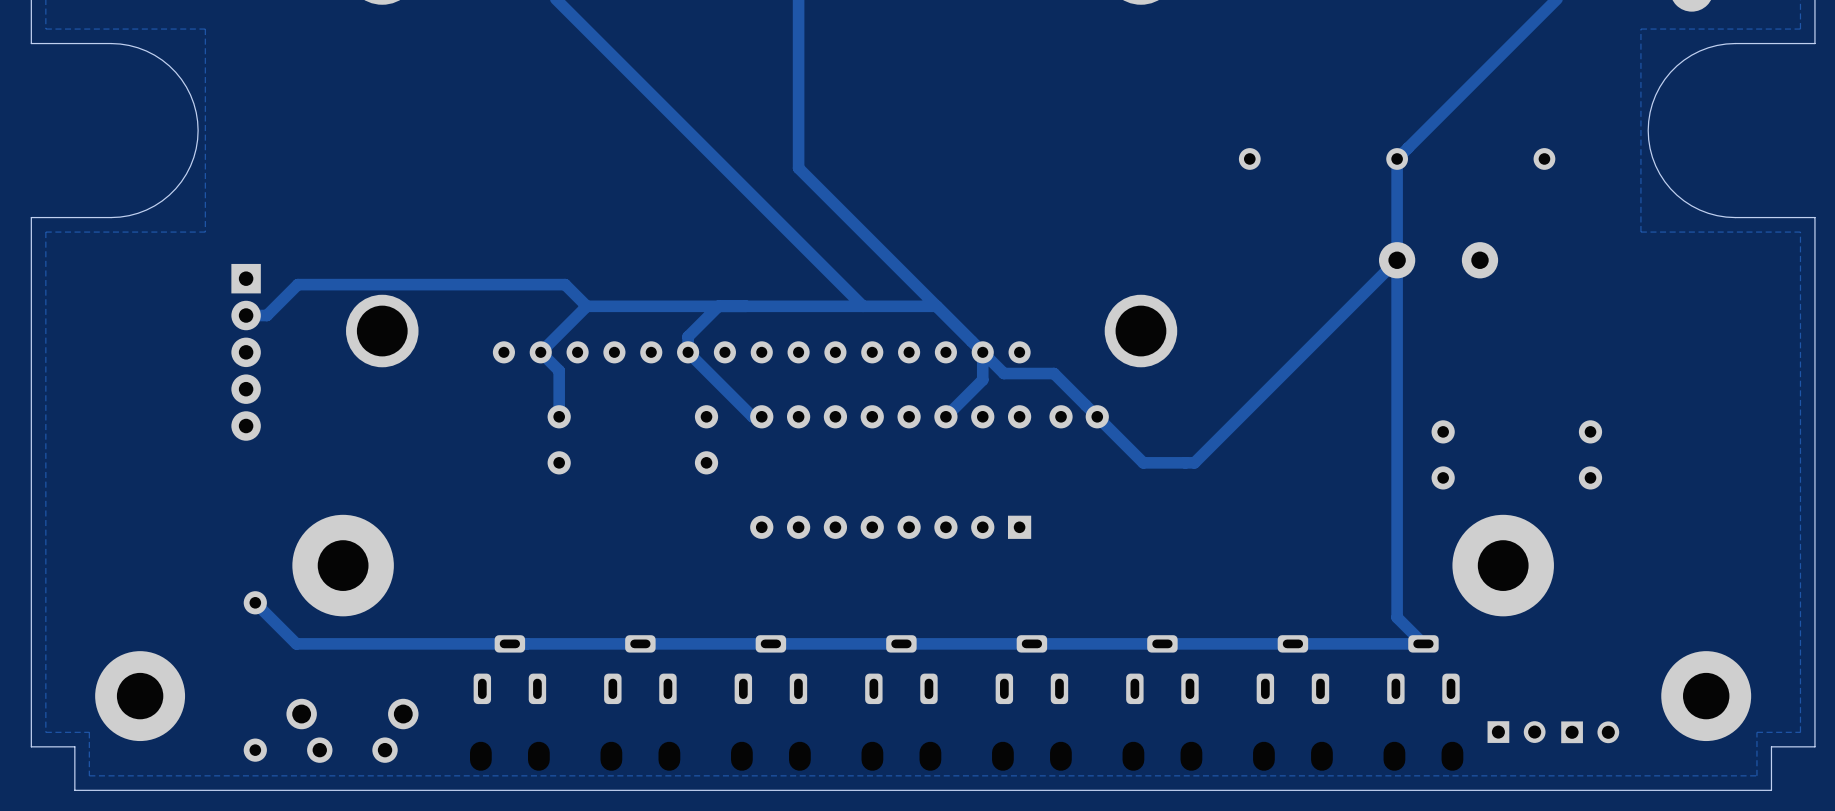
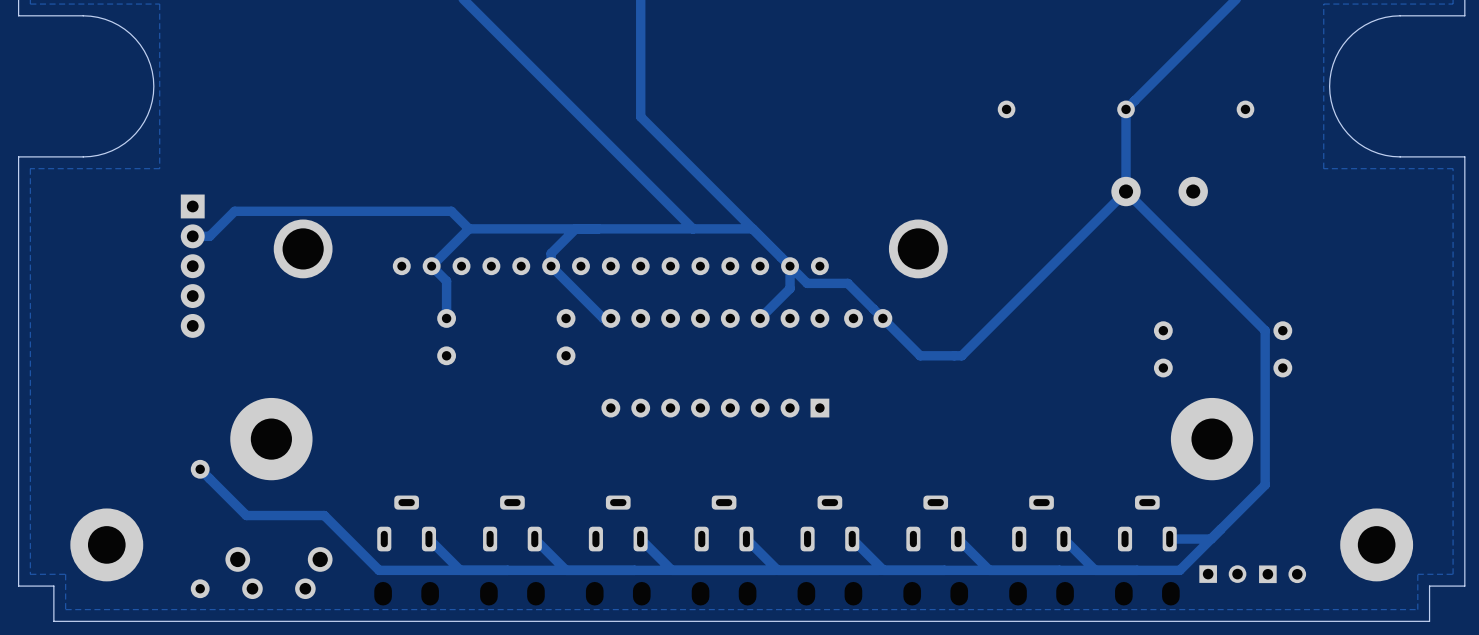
track: (1397, 261) (1397, 617) (1423, 643) (296, 643) -> (1126, 191) (1265, 330) (1265, 484) (1179, 570) (379, 570) (324, 515) (246, 515) (233, 502)
track: none -> (428, 539) (460, 570)
track: none -> (534, 539) (566, 570)
track: none -> (640, 539) (671, 570)
track: none -> (746, 539) (777, 570)
track: none -> (852, 539) (883, 570)
track: none -> (958, 539) (989, 570)
track: none -> (1063, 539) (1095, 570)
track: none -> (1211, 539) (1169, 539)

